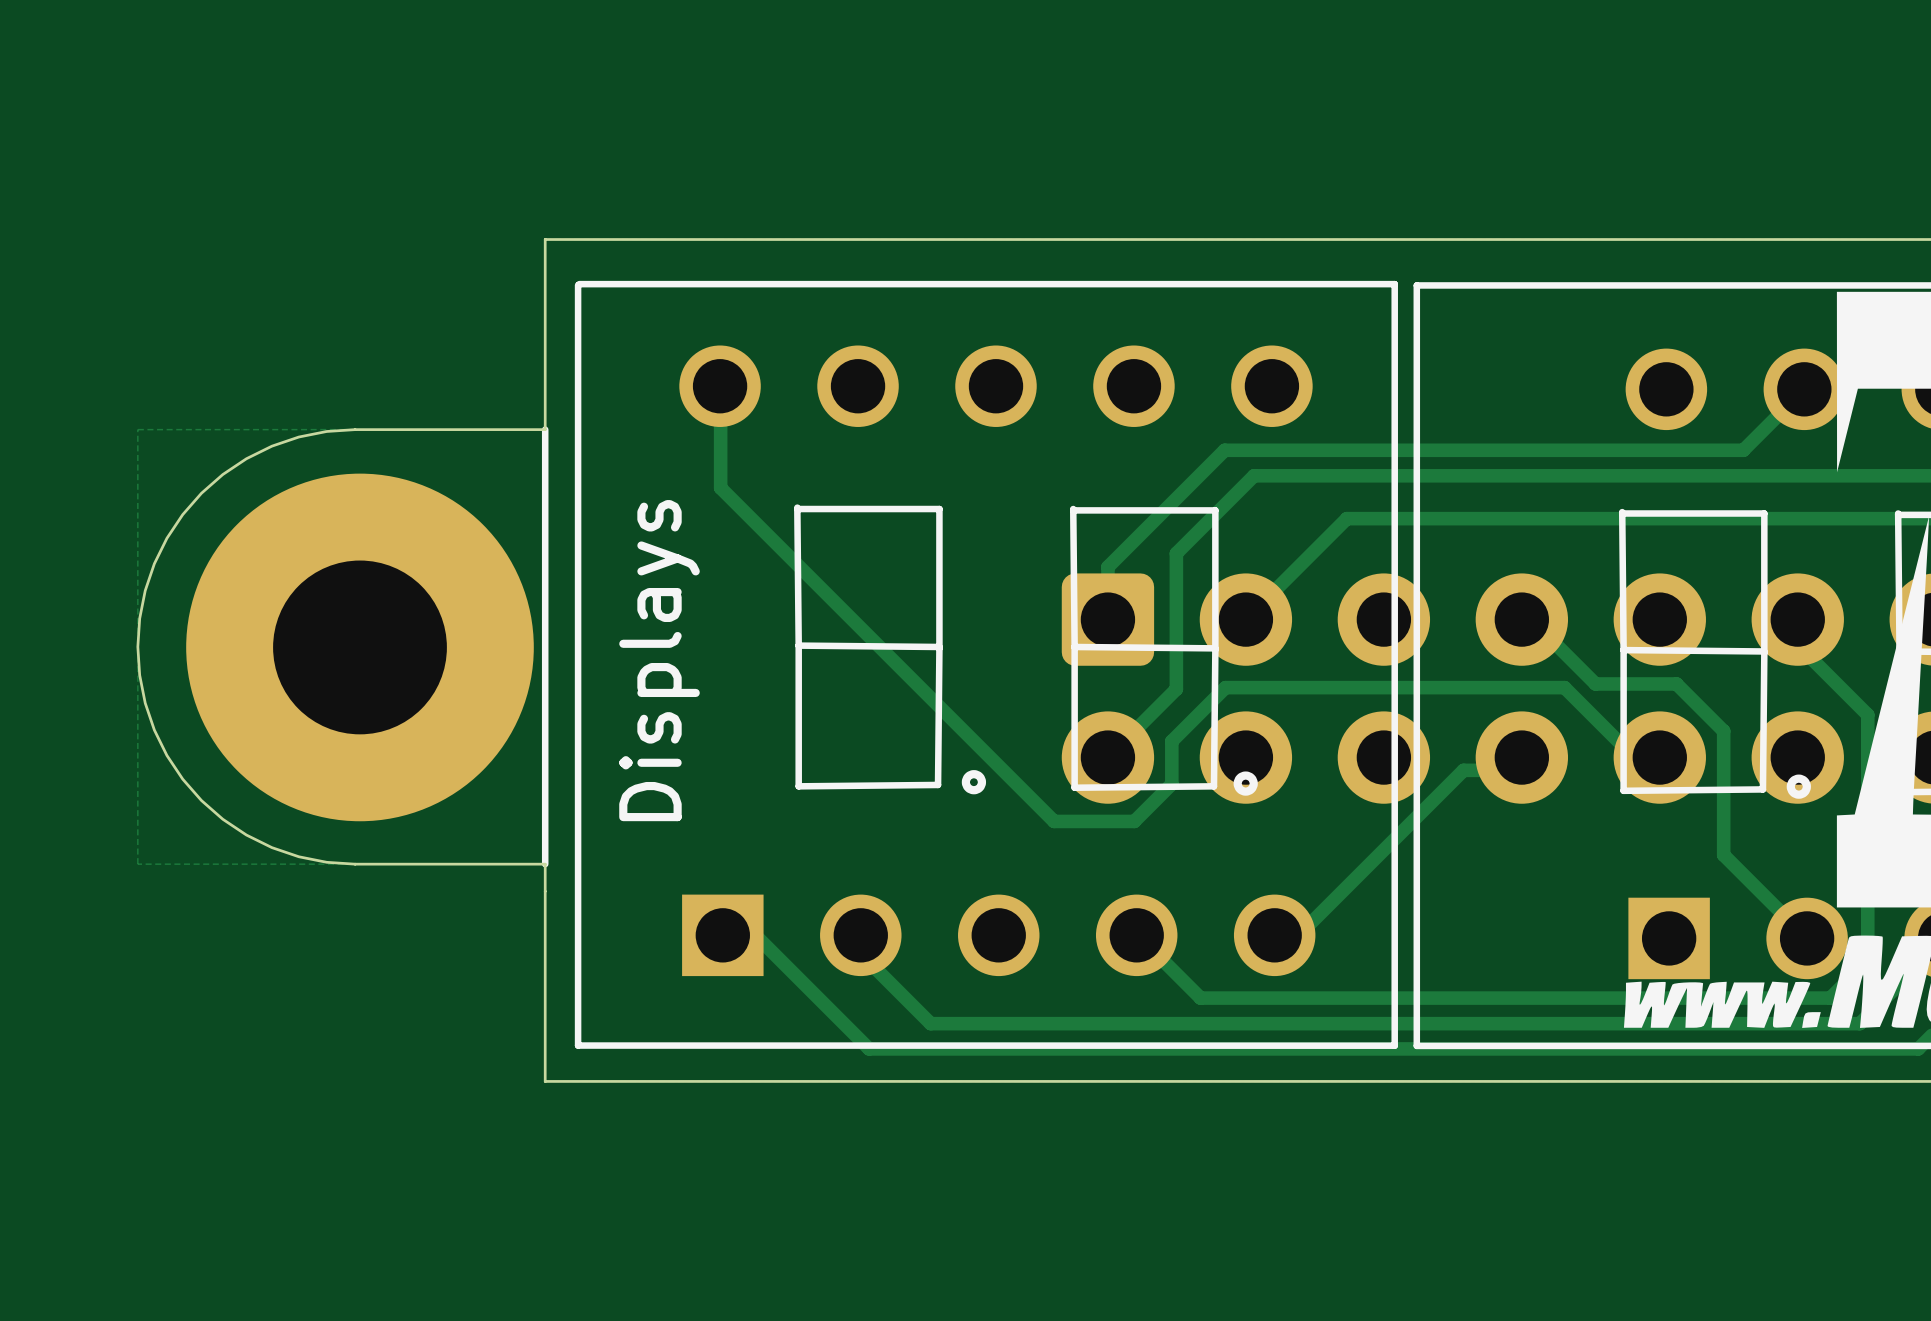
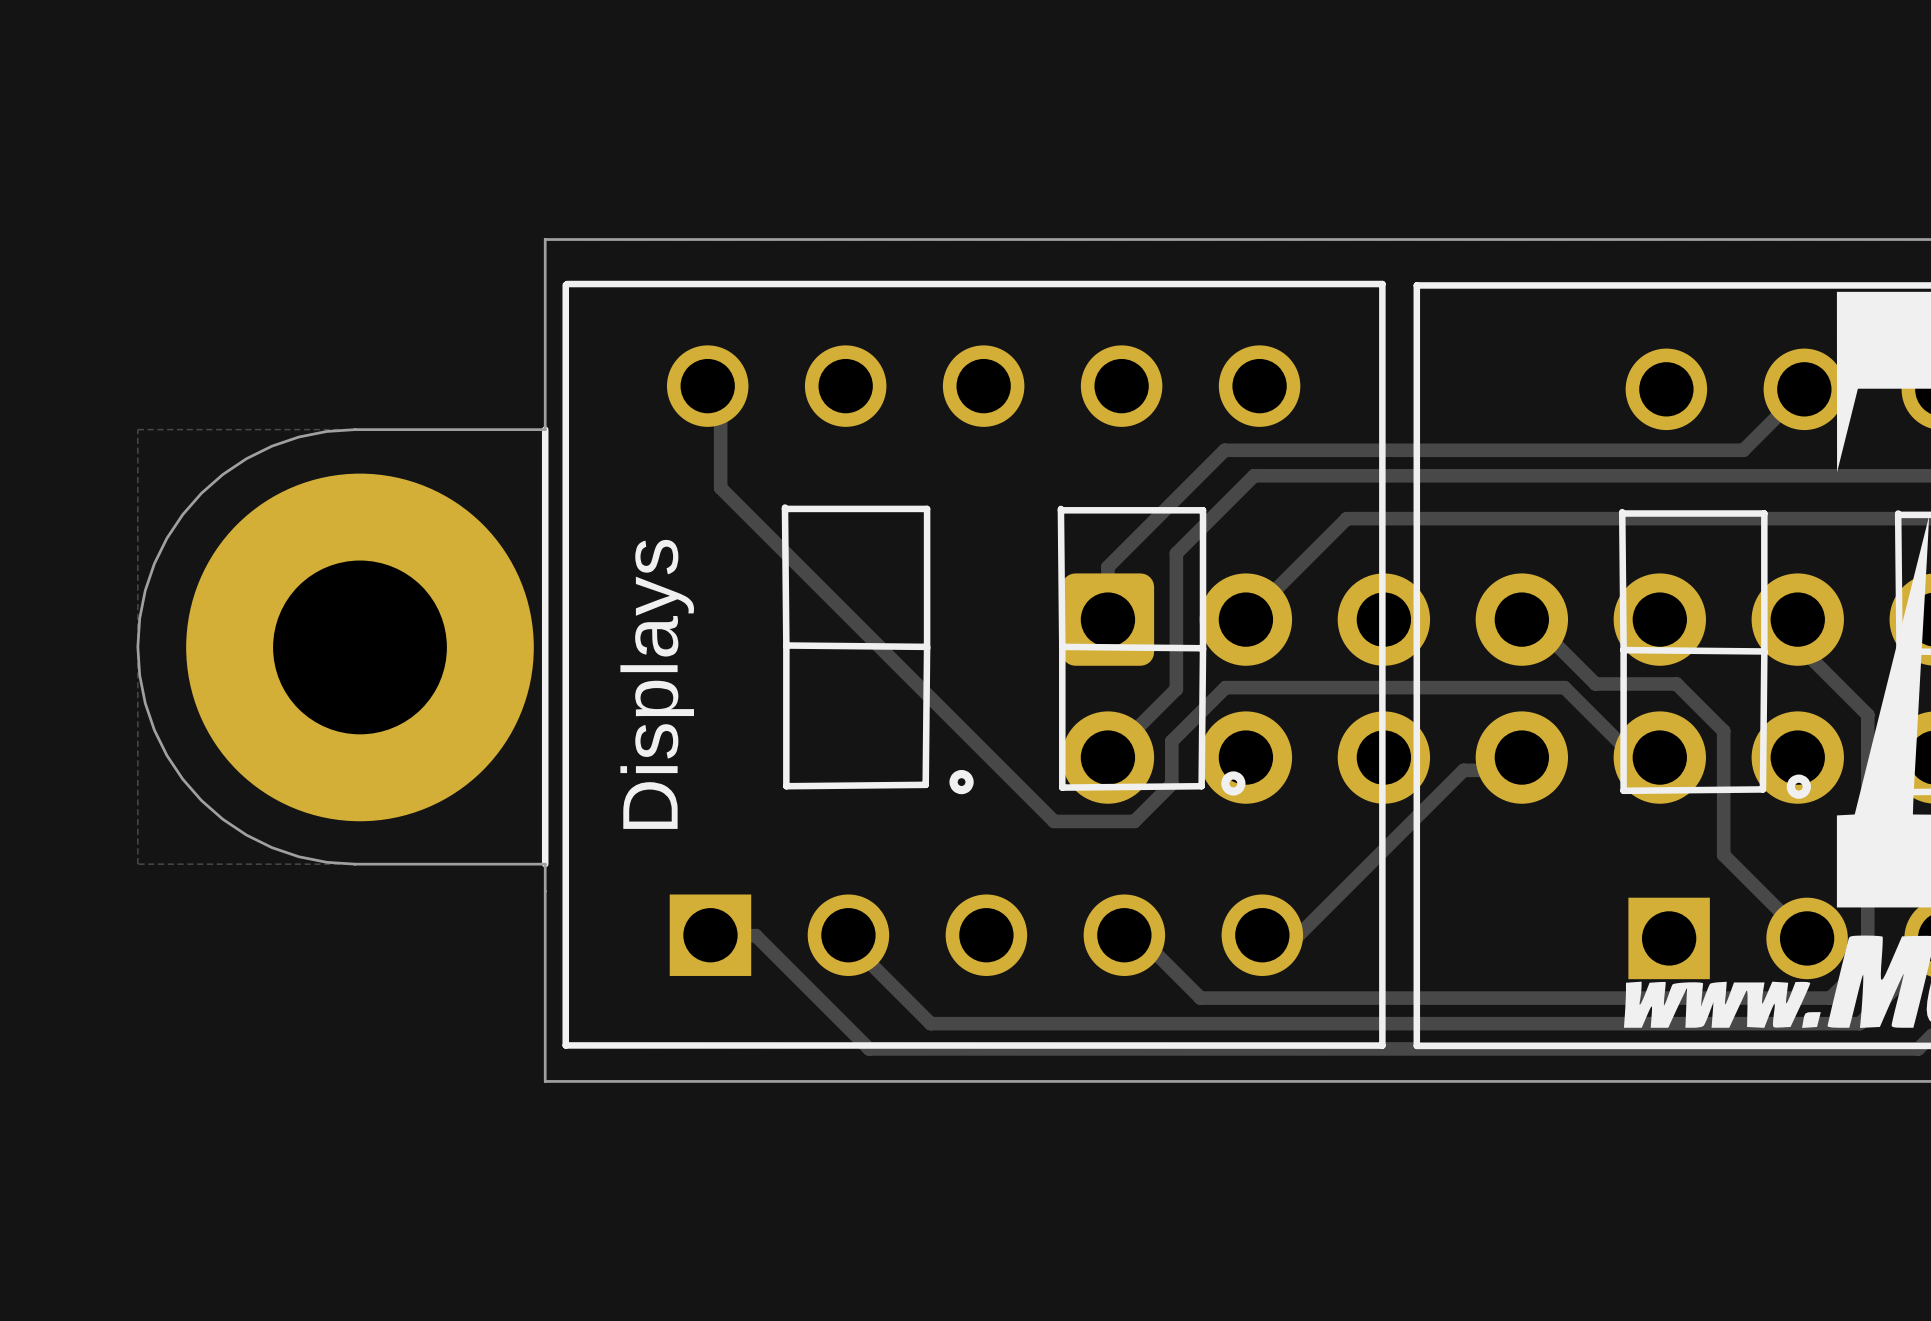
part position: (986, 664) -> (974, 664)

